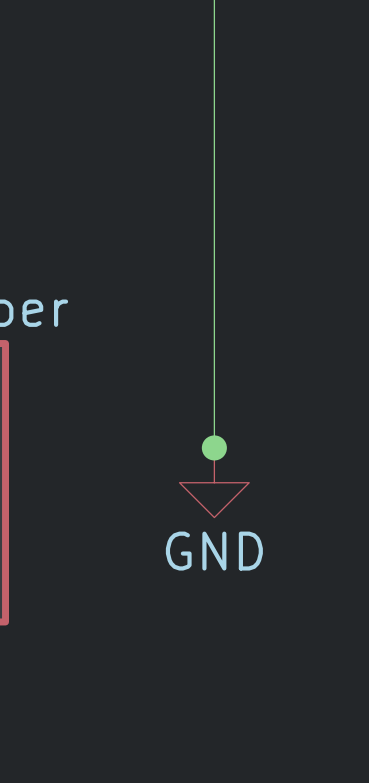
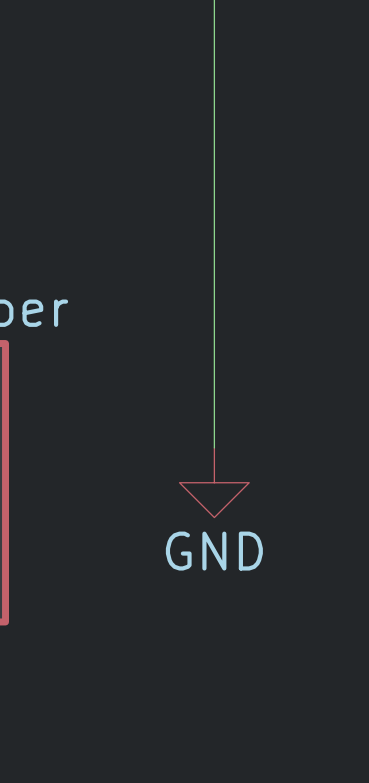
junction: (214, 447) -> none

